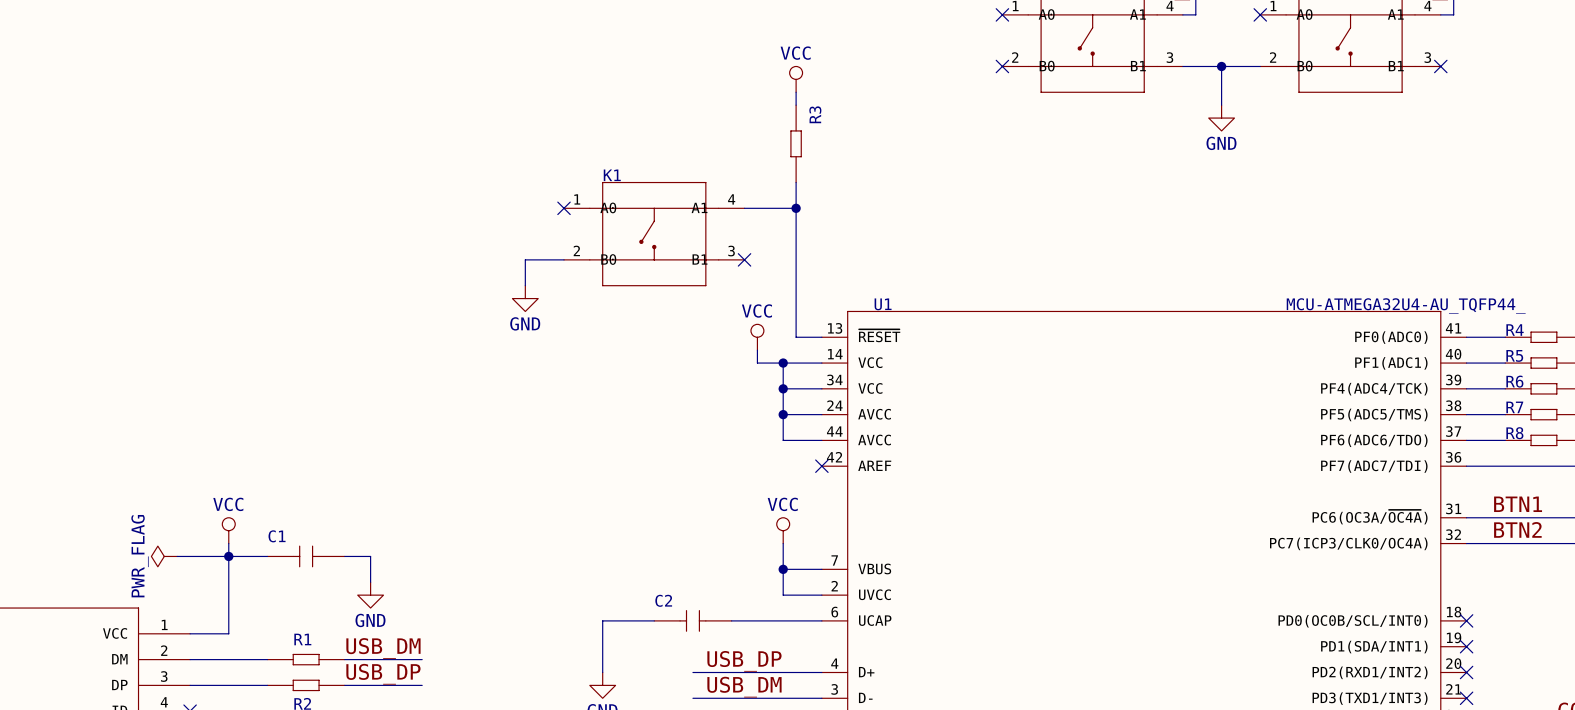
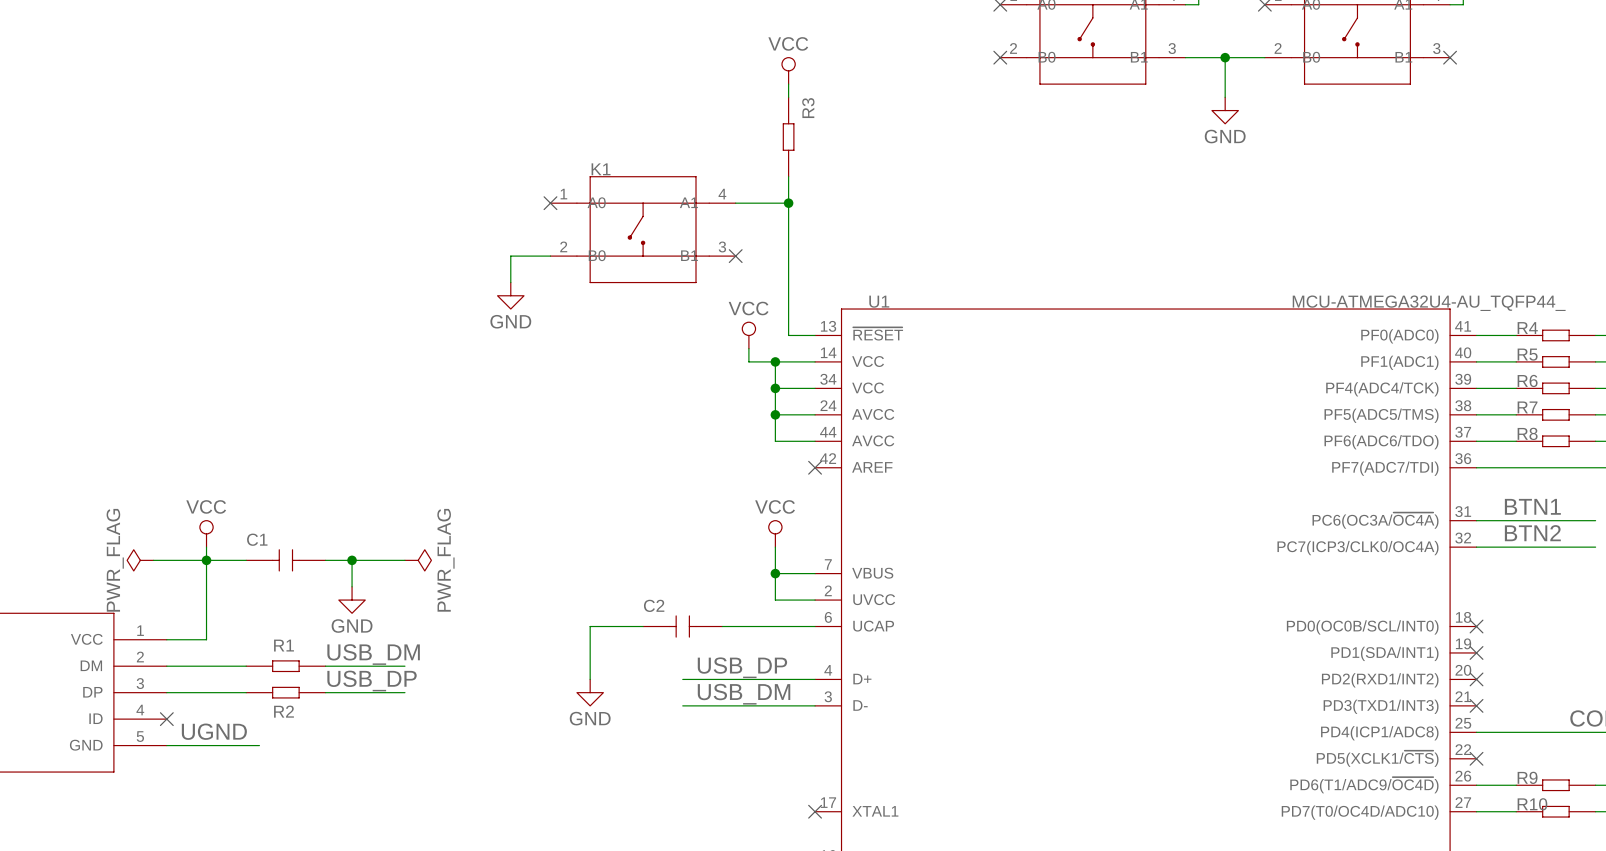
wire: none -> (352, 560) (404, 560)
junction: none -> (352, 560)
power symbol: none -> PWR_FLAG (418, 560)

